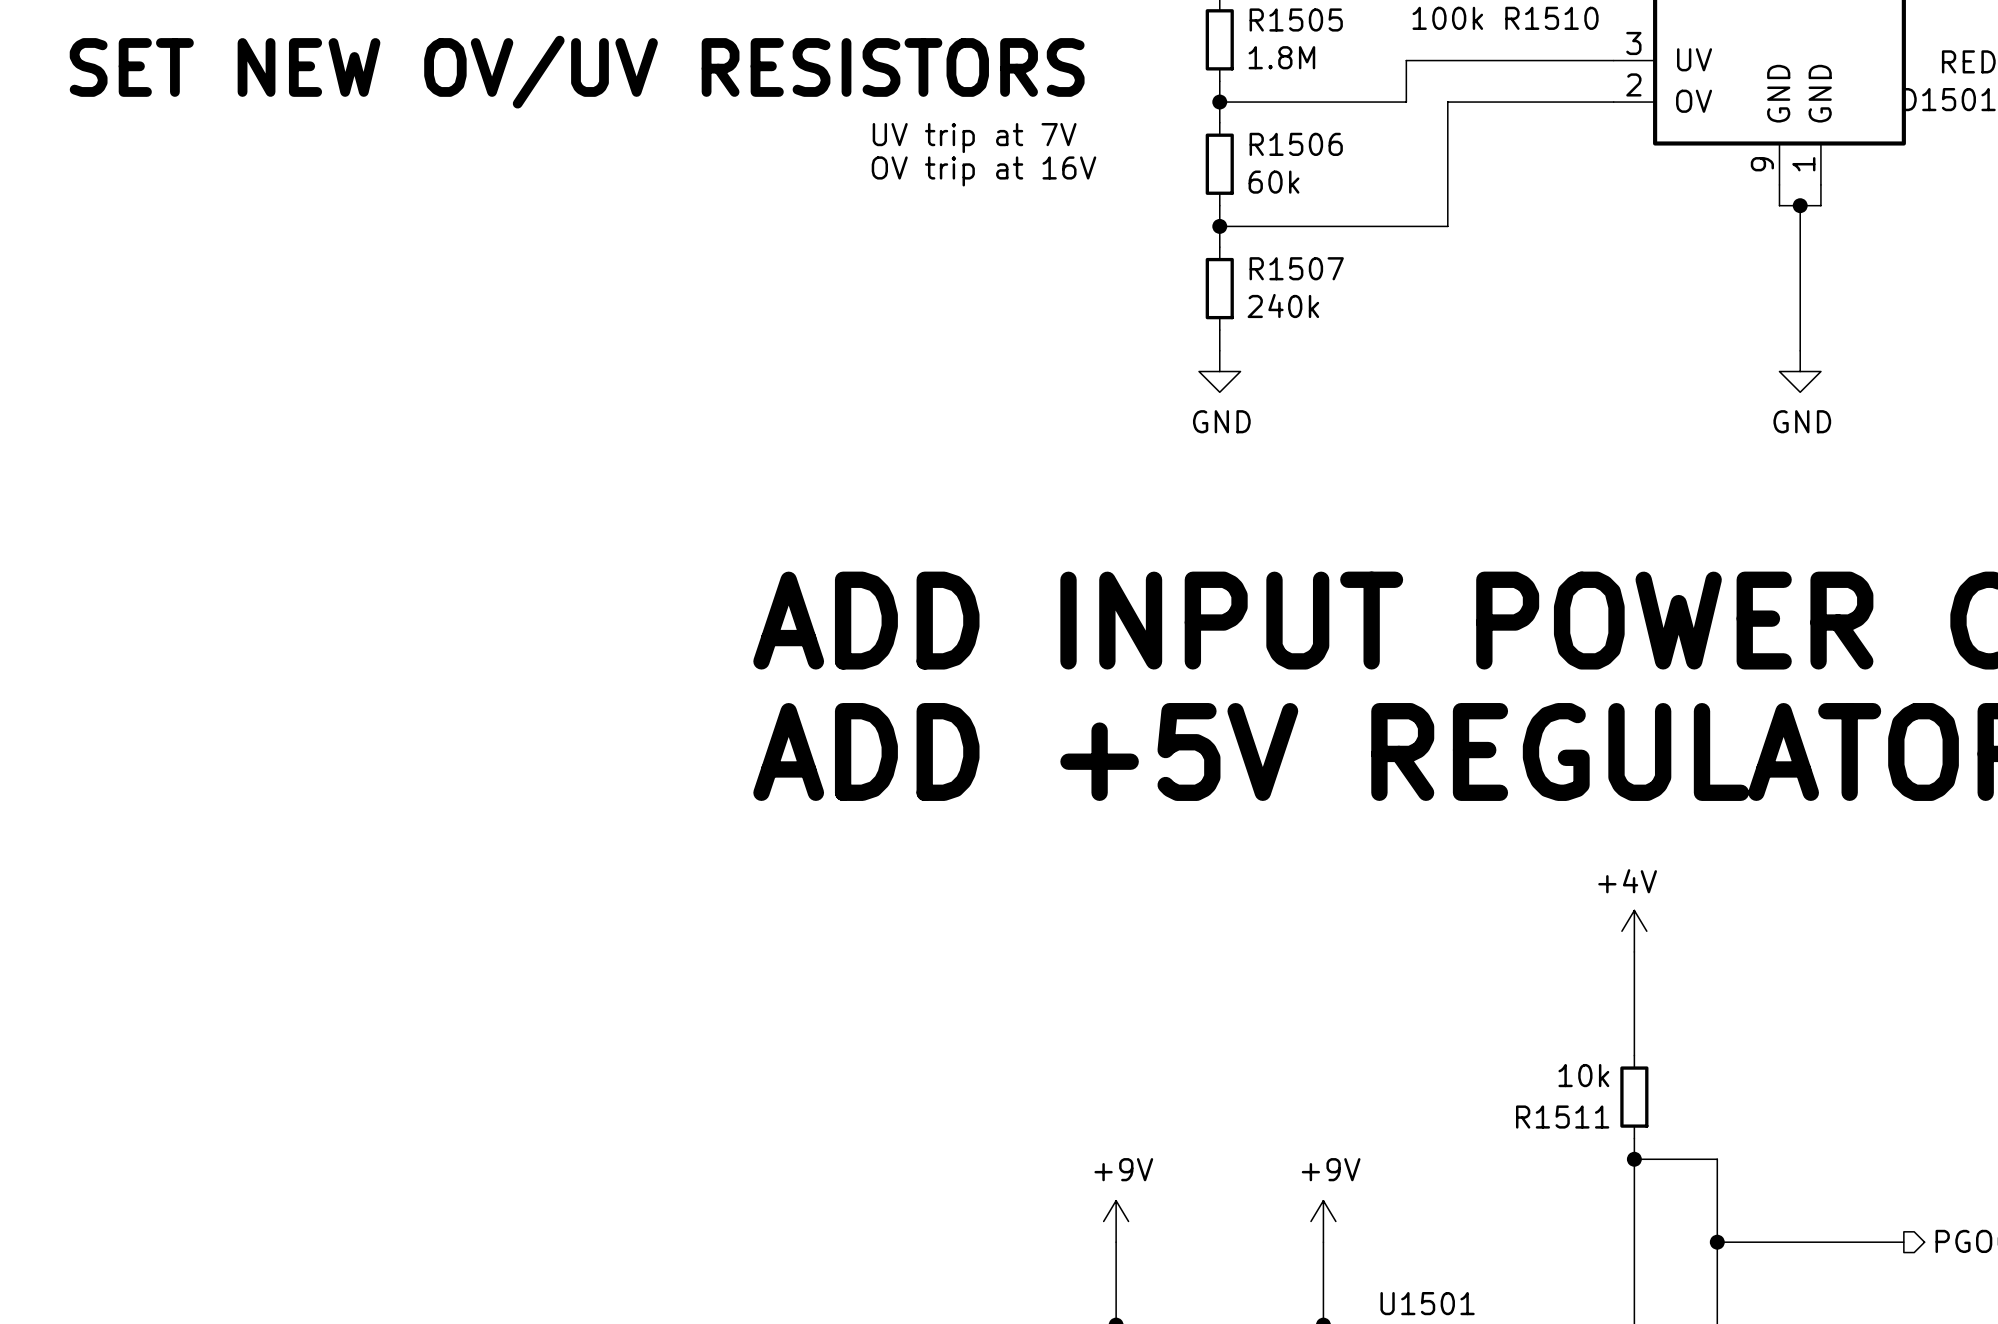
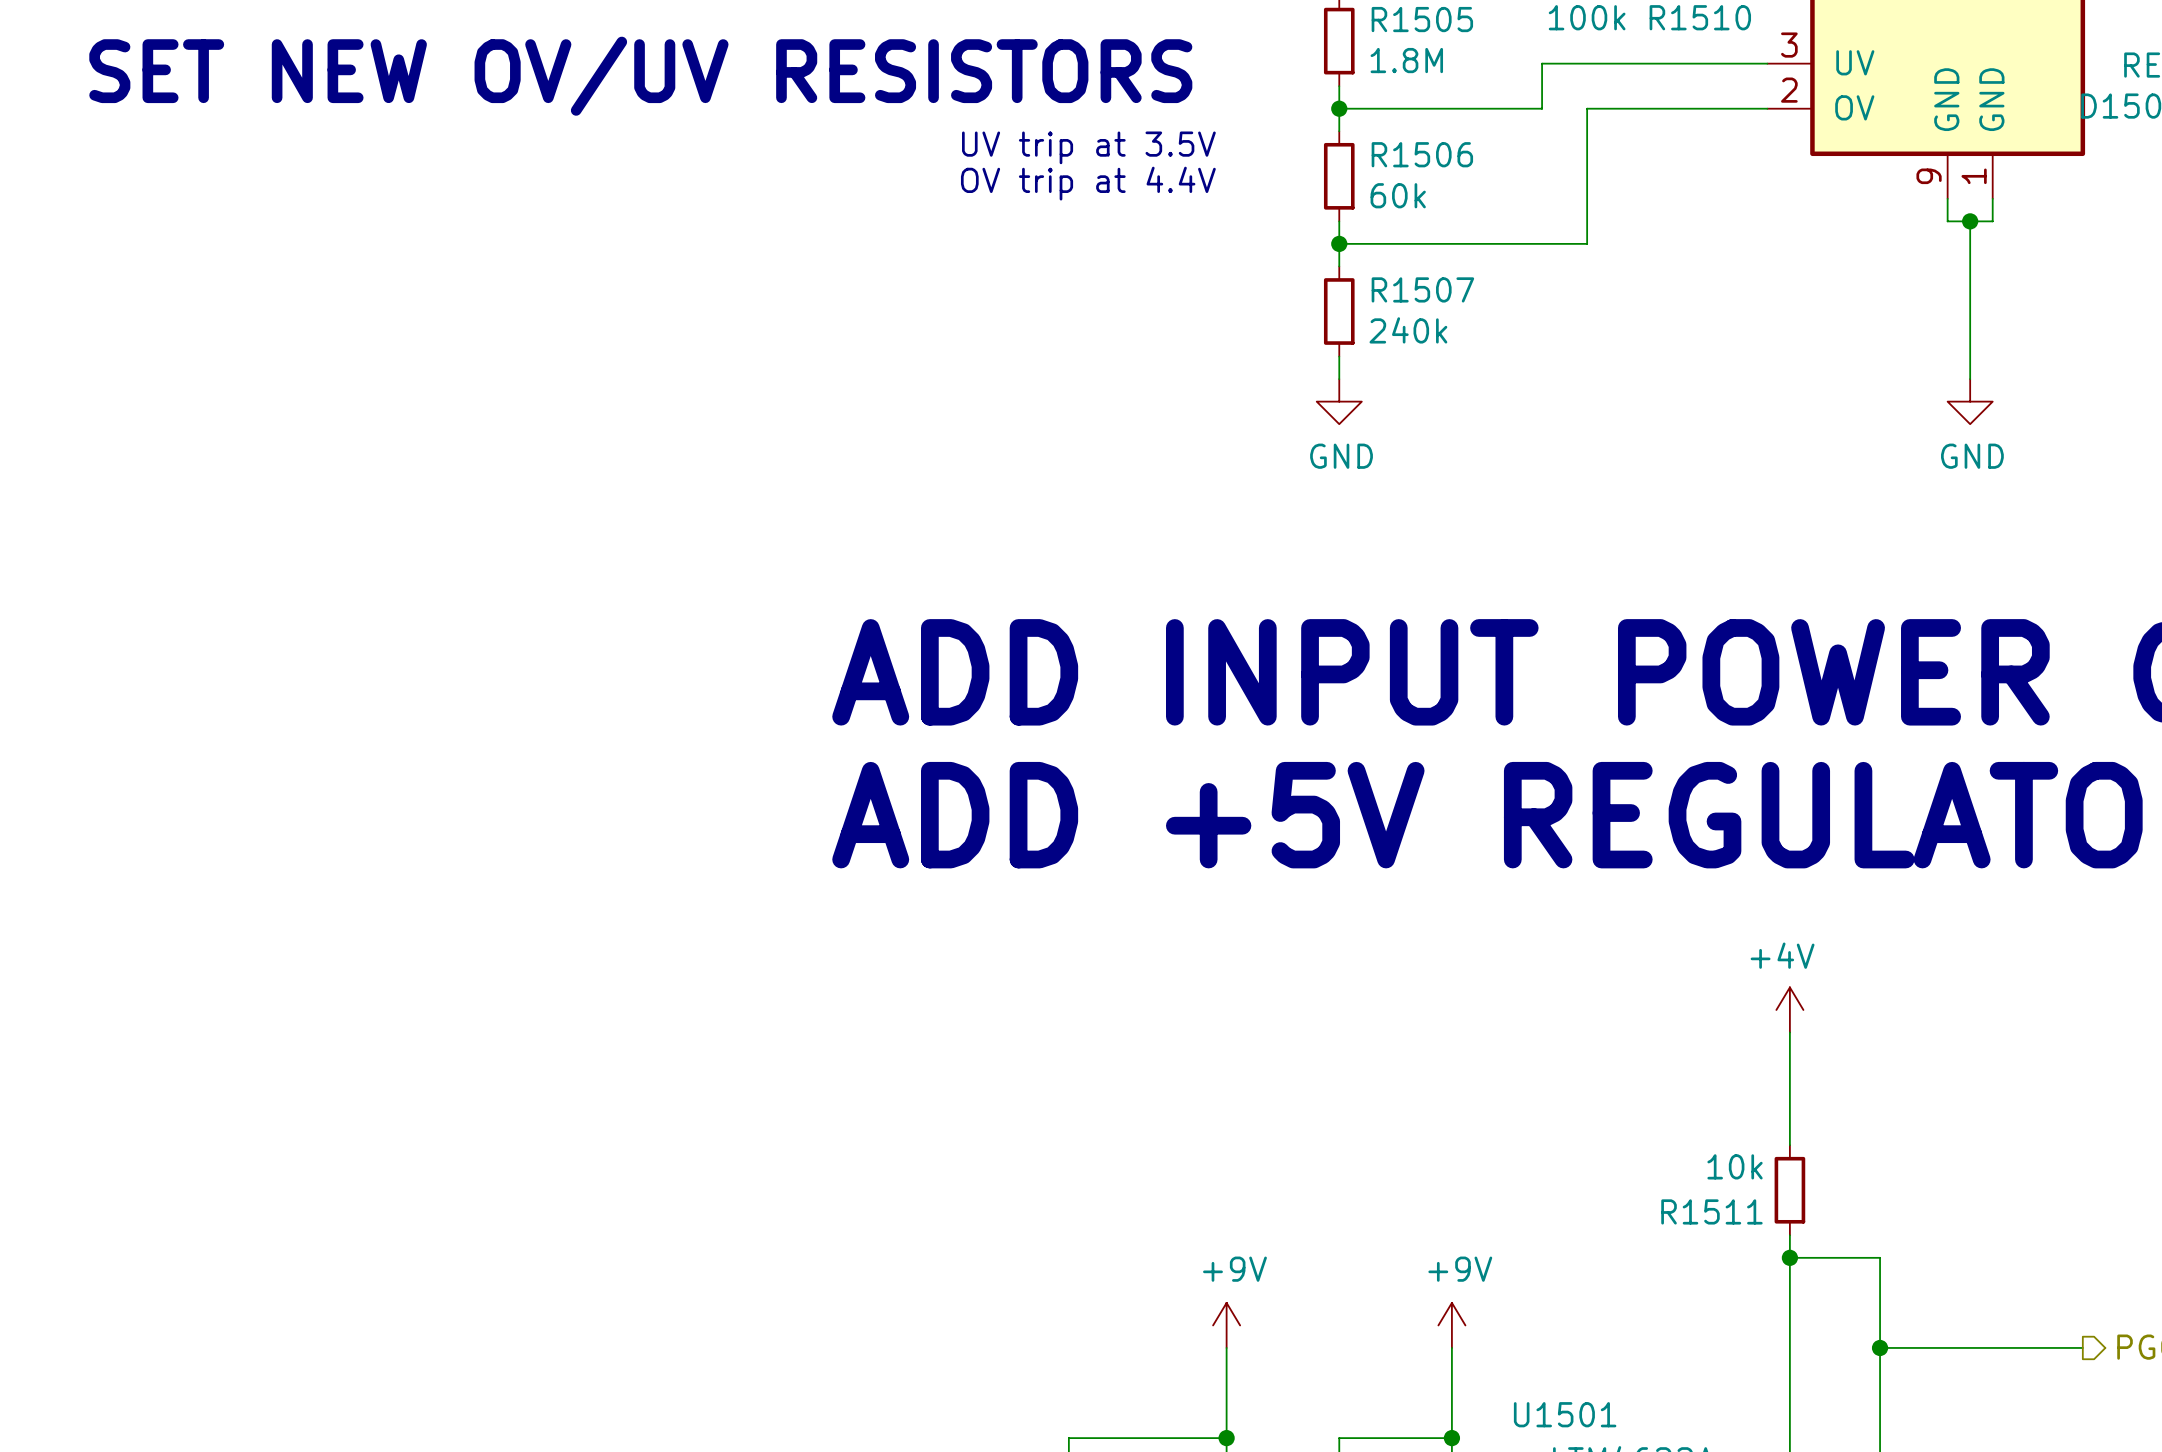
text: UV trip at 7V (974, 138) -> UV trip at 3.5V (1088, 147)
text: OV trip at 16V (983, 171) -> OV trip at 4.4V (1088, 183)

